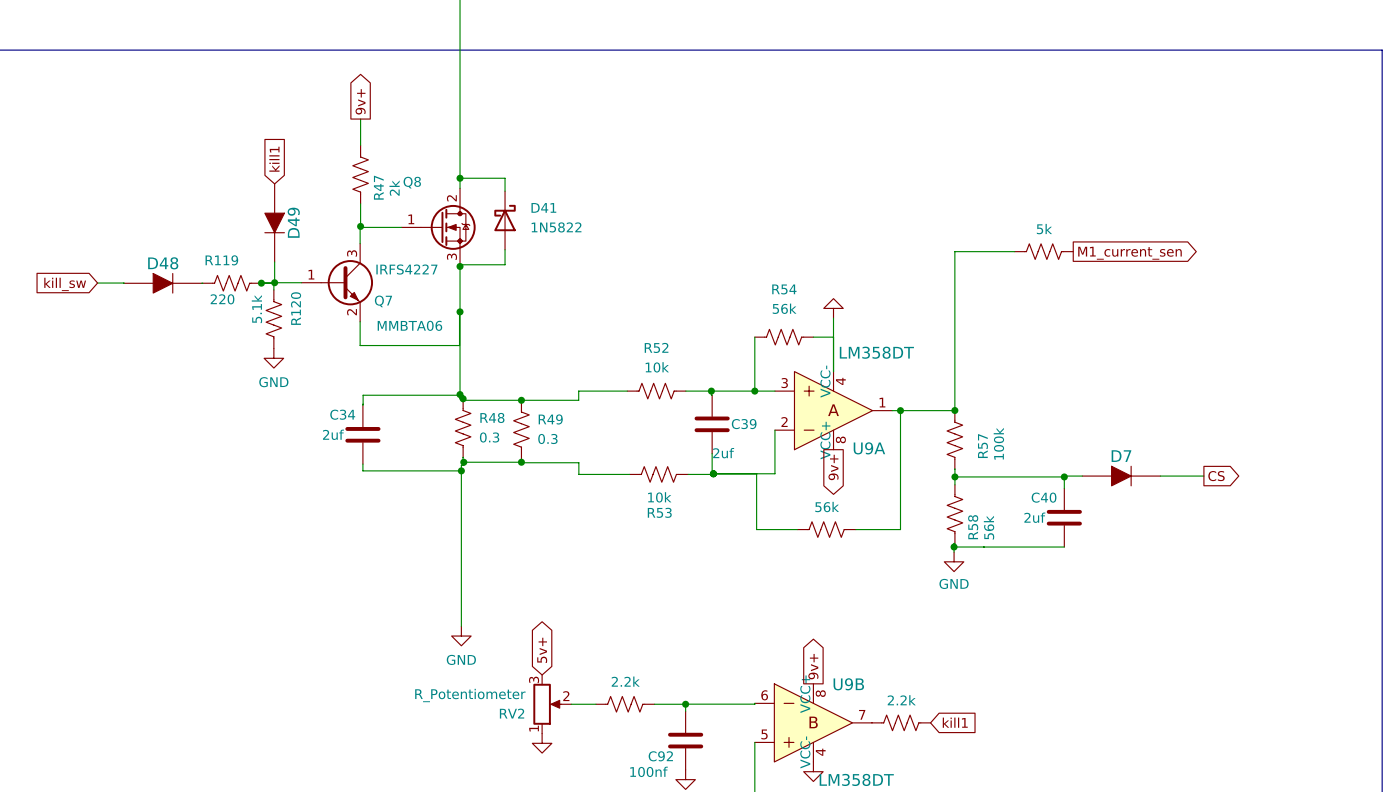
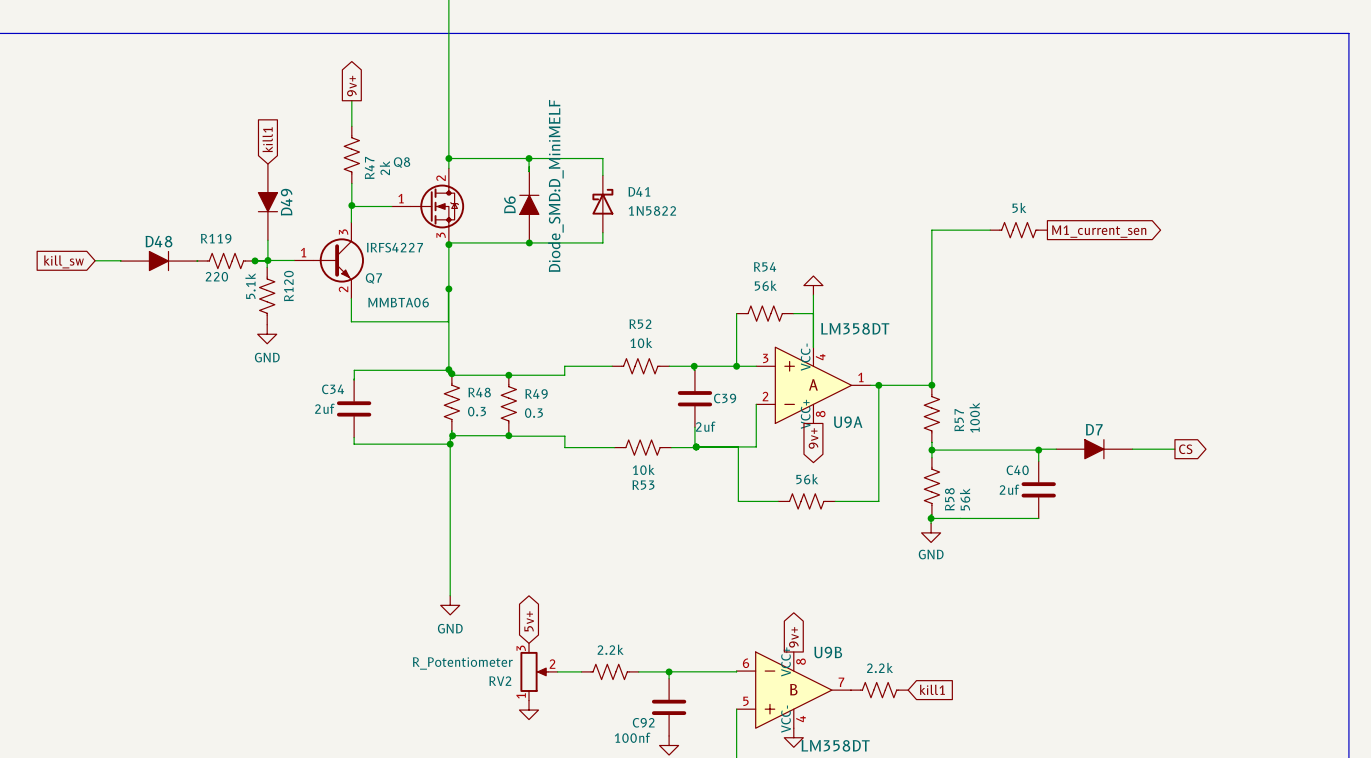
wire: (505, 178) (505, 191) -> (492, 158) (602, 158) (602, 175)
wire: none -> (529, 158) (529, 171) (529, 166)
junction: none -> (529, 158)
D41 position: (505, 220) -> (602, 204)
D6: none -> (529, 204)
wire: (505, 249) (505, 264) -> (602, 232) (602, 242) (492, 242)
junction: none -> (529, 242)

